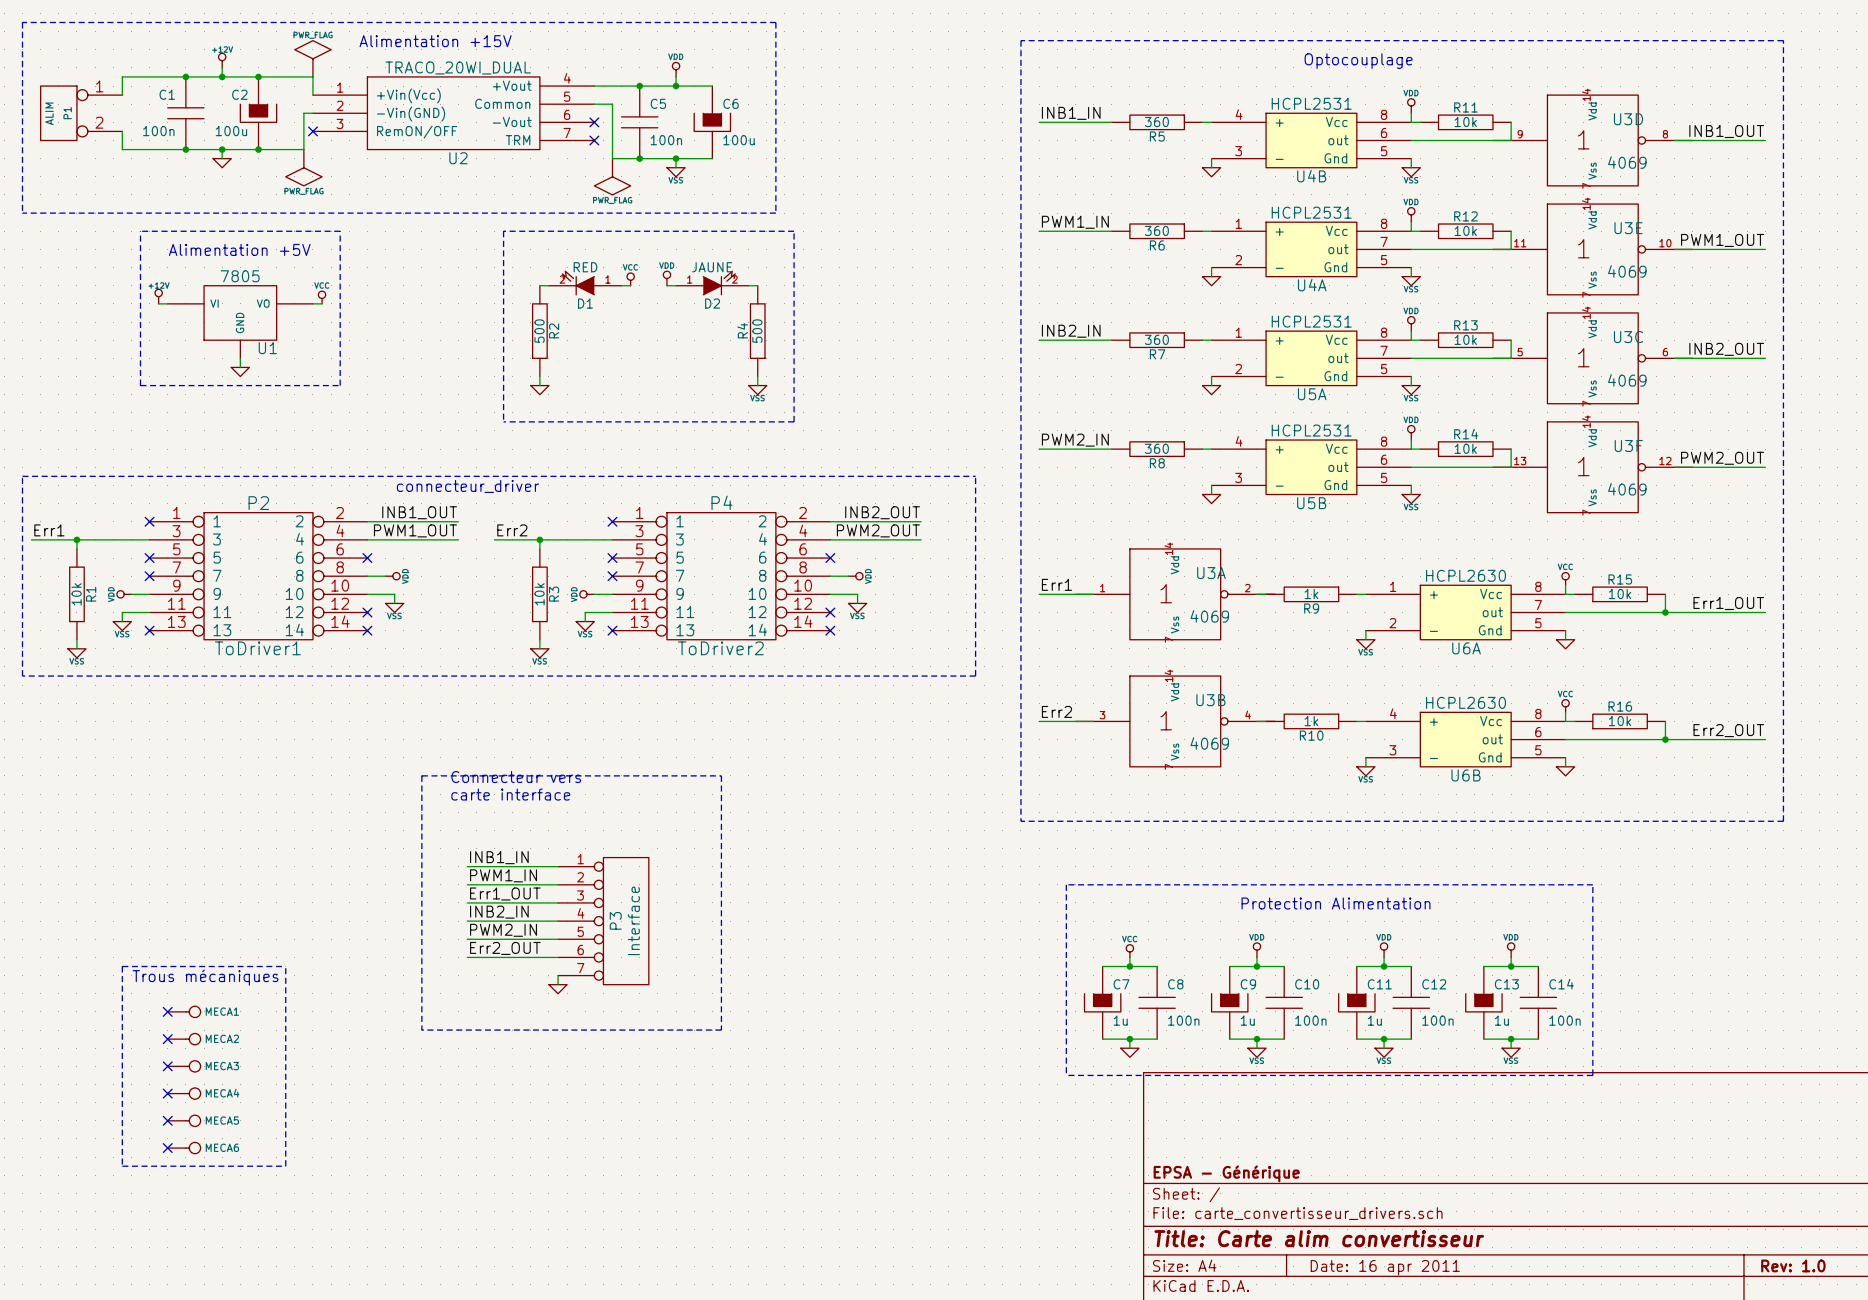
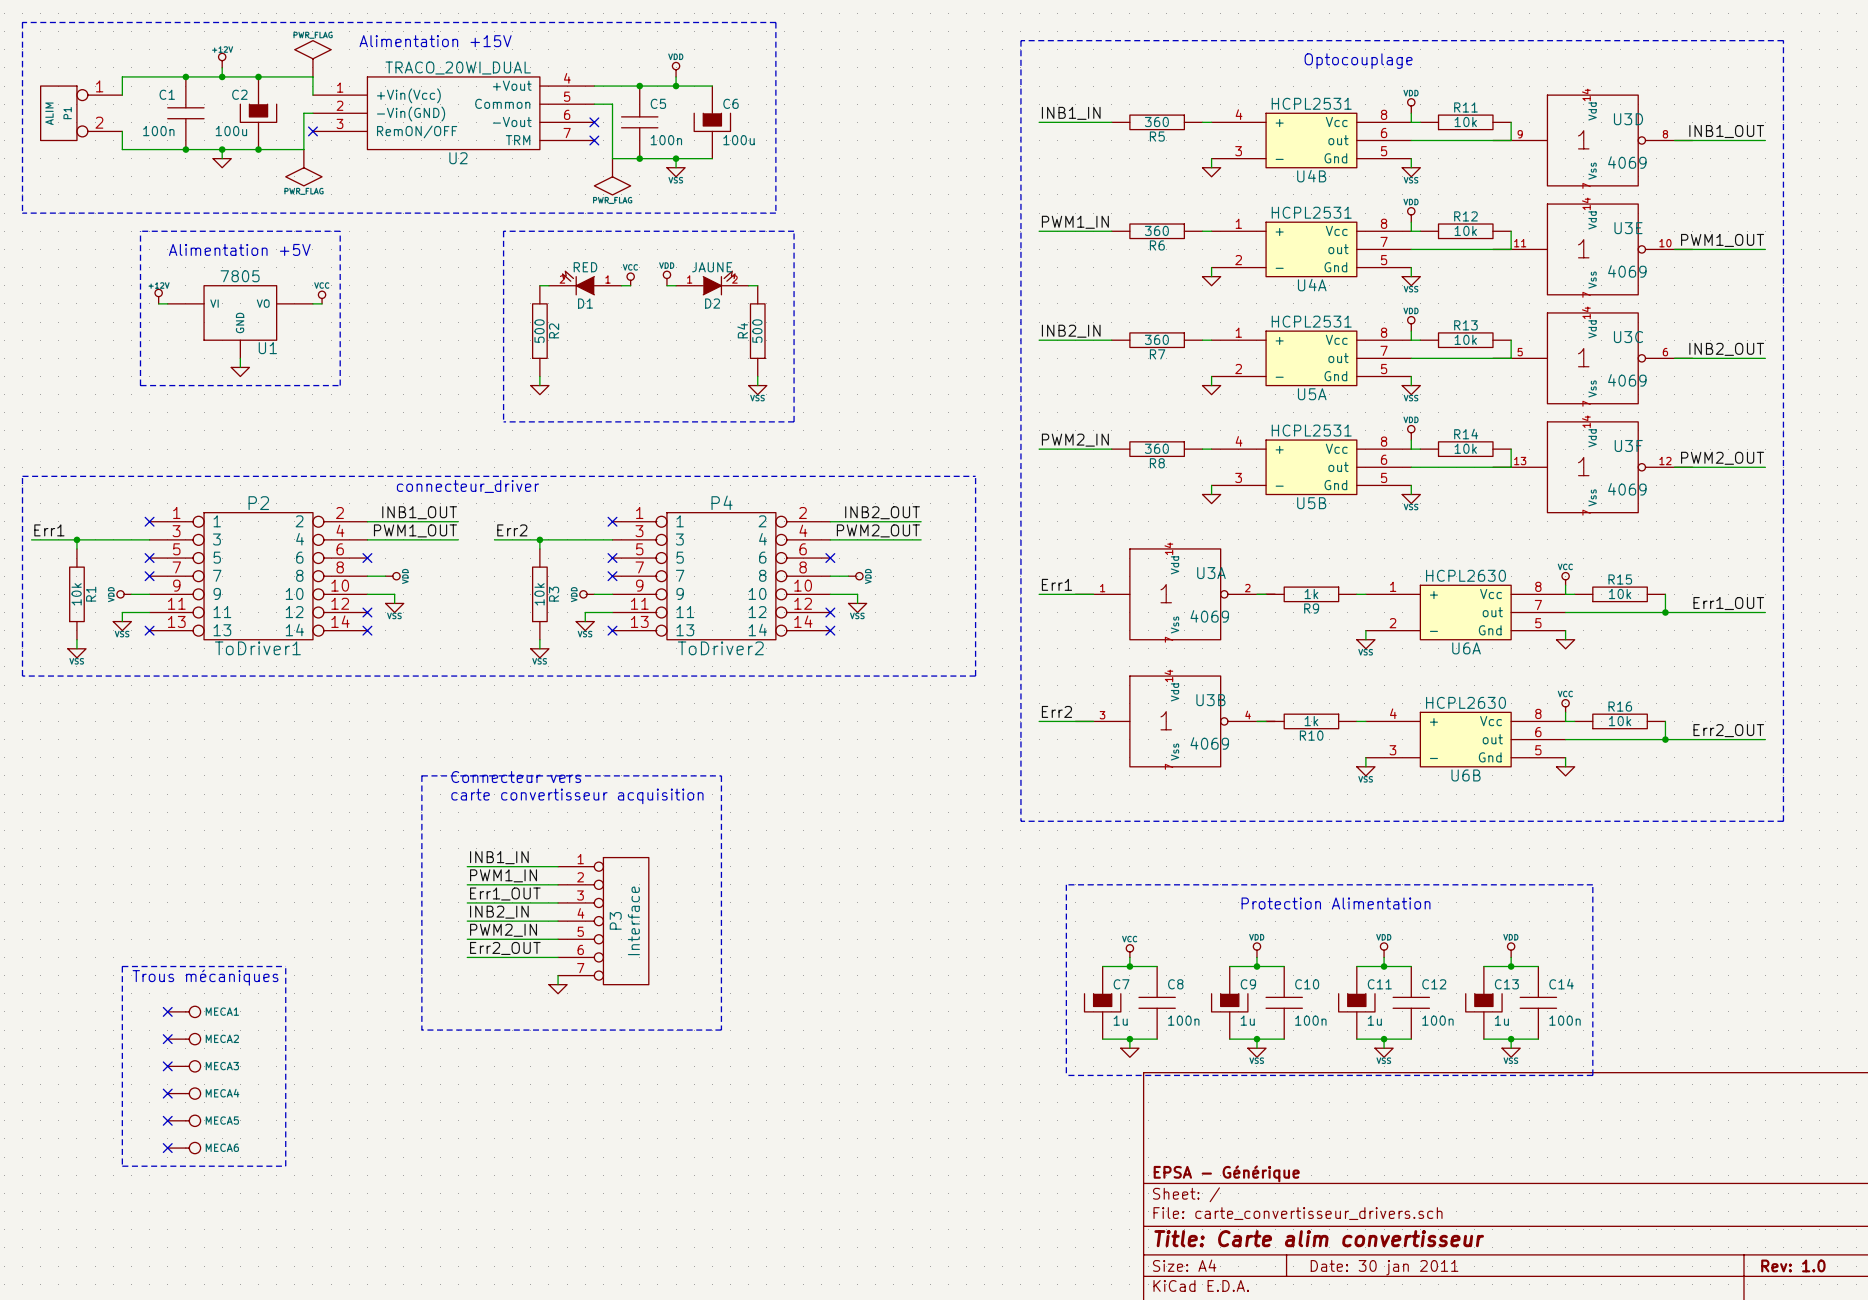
text: carte interface (510, 794) -> carte convertisseur acquisition (577, 796)
title block: Date: 16 apr 2011 (1385, 1267) -> Date: 30 jan 2011 (1384, 1267)

